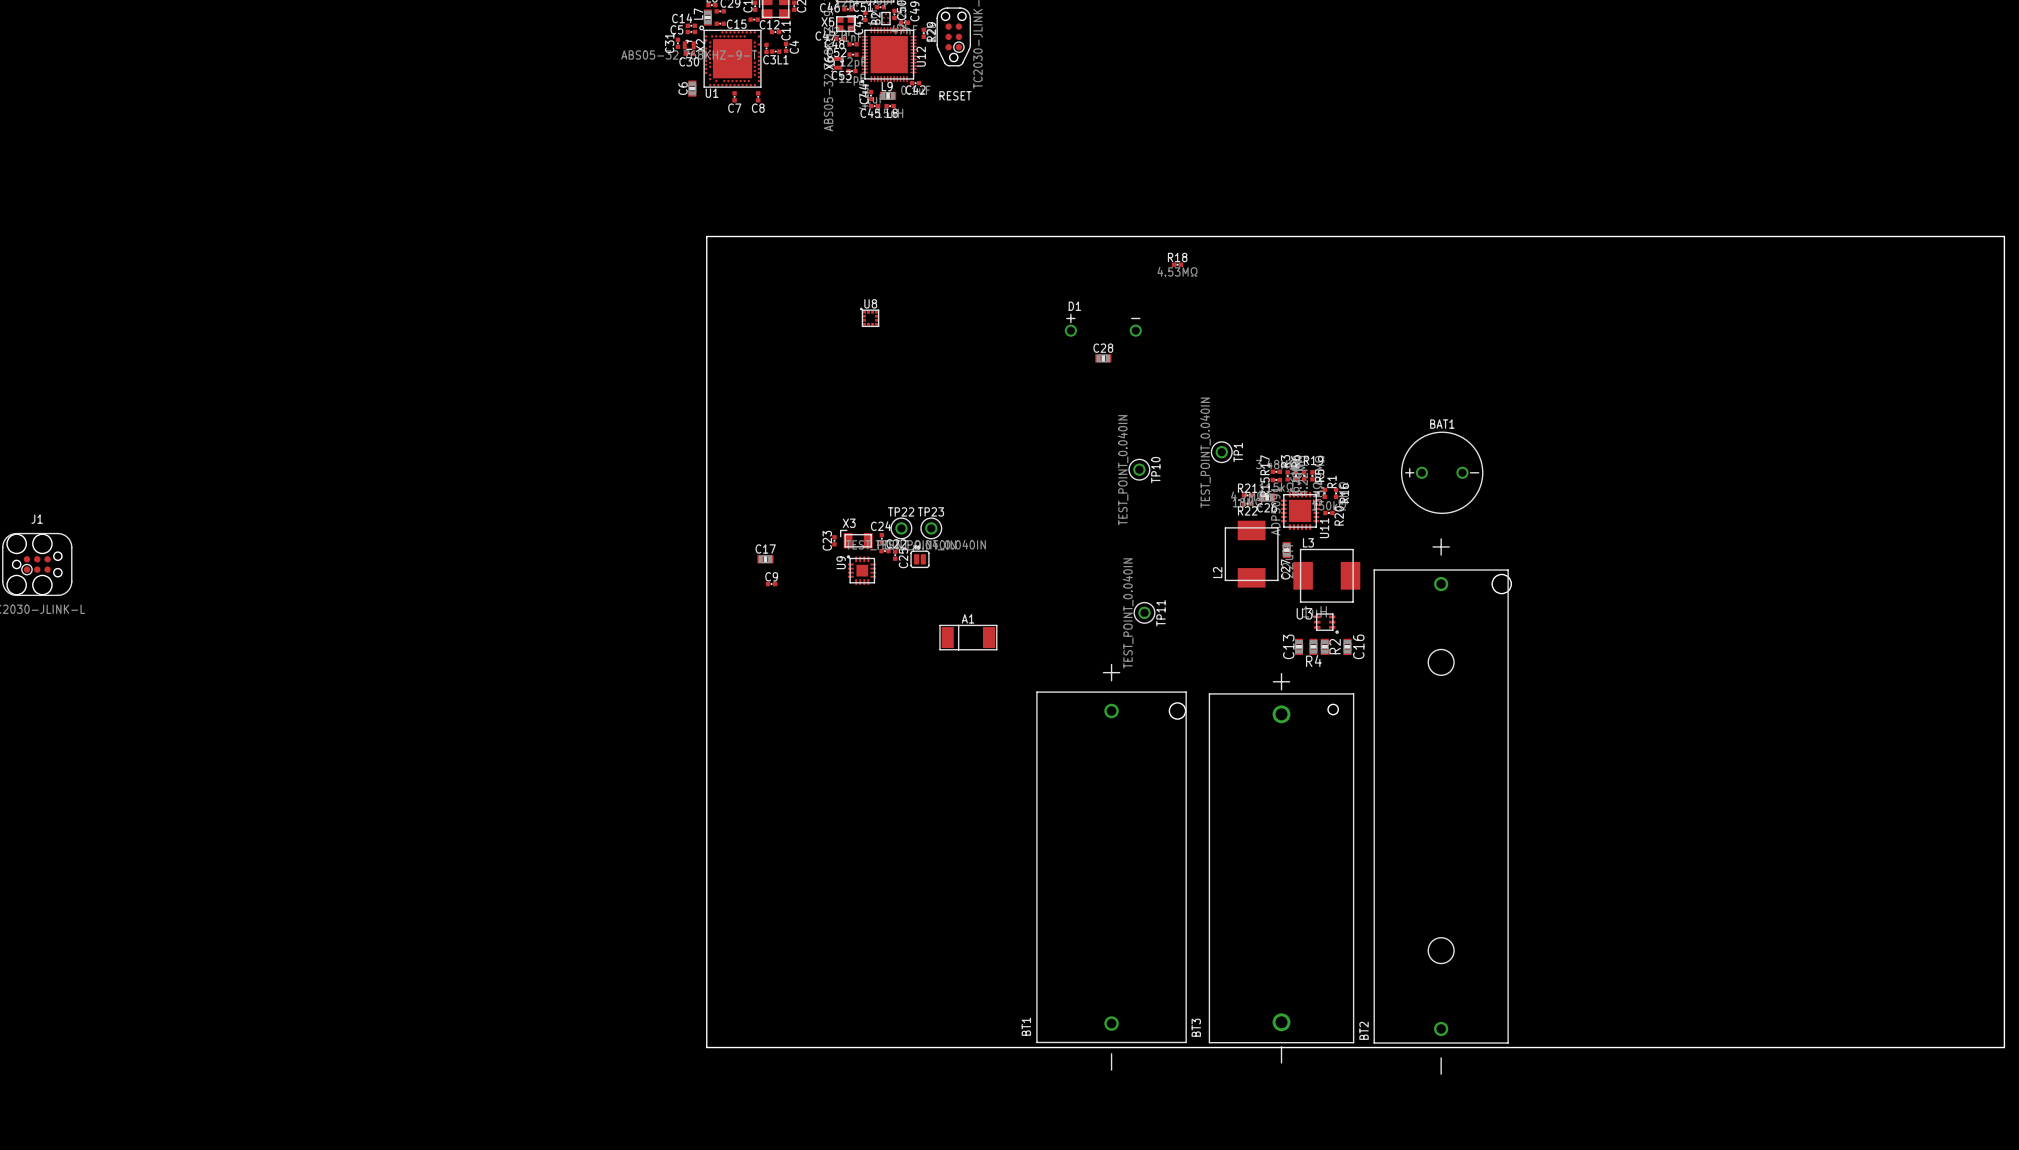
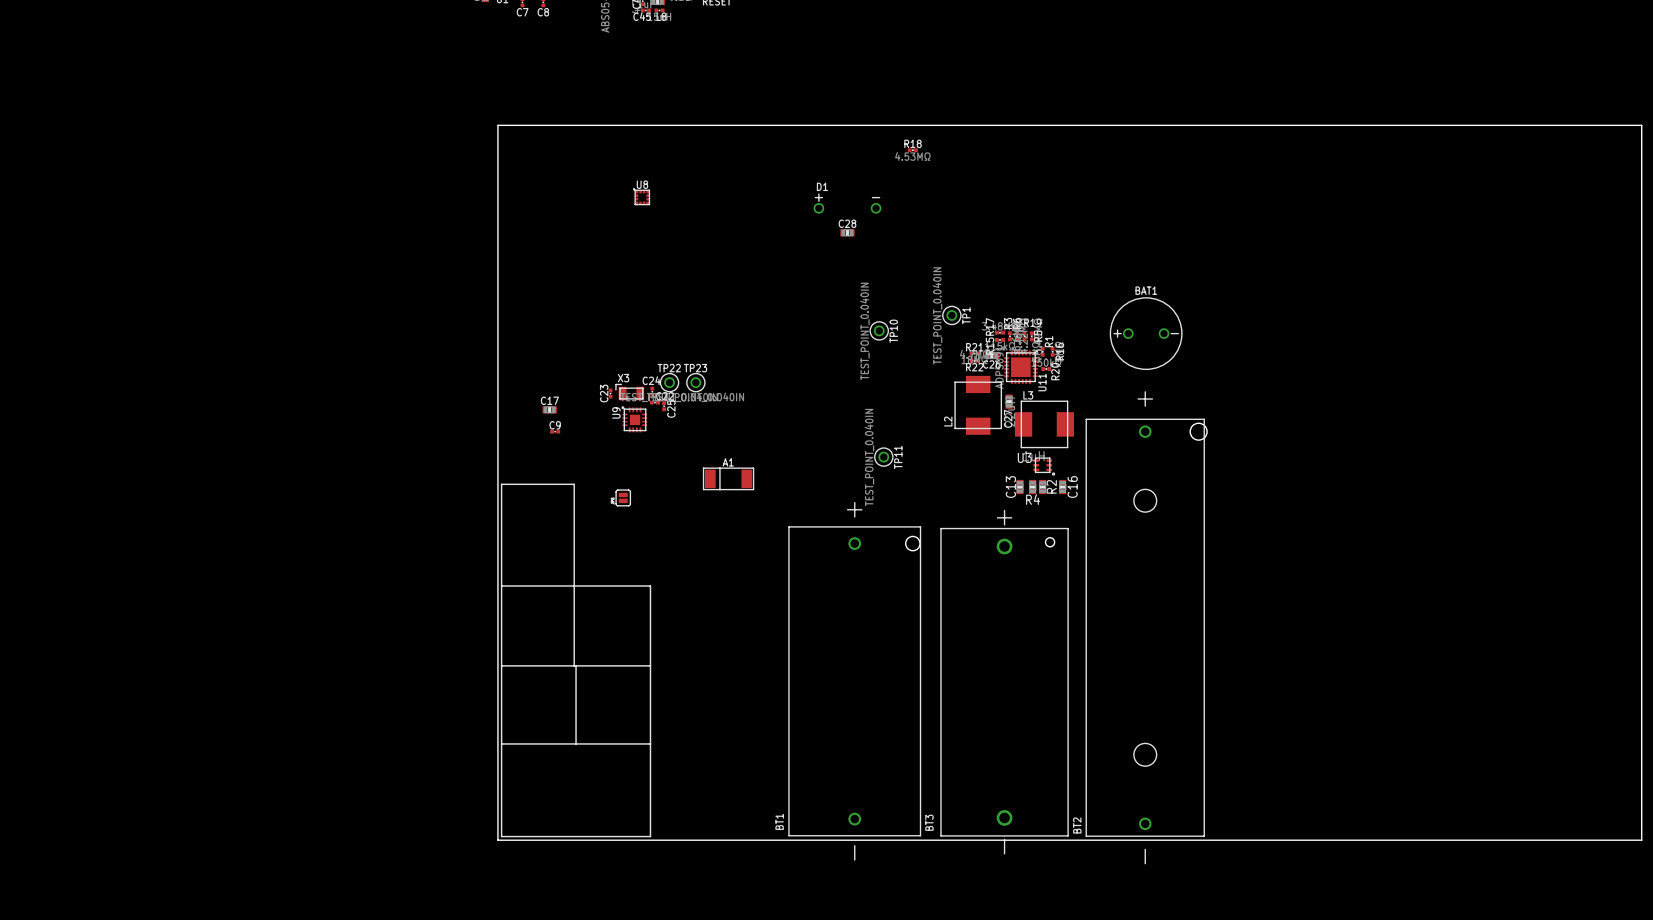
part rotation: 0° (919, 559) -> 90° counterclockwise (623, 497)
part position: (919, 559) -> (623, 497)
line: none -> (501, 586) (650, 586) (650, 836) (501, 836) (501, 484) (574, 484) (574, 665)
line: none -> (501, 665) (650, 665)
line: none -> (576, 665) (576, 743)
line: none -> (501, 743) (650, 743)

